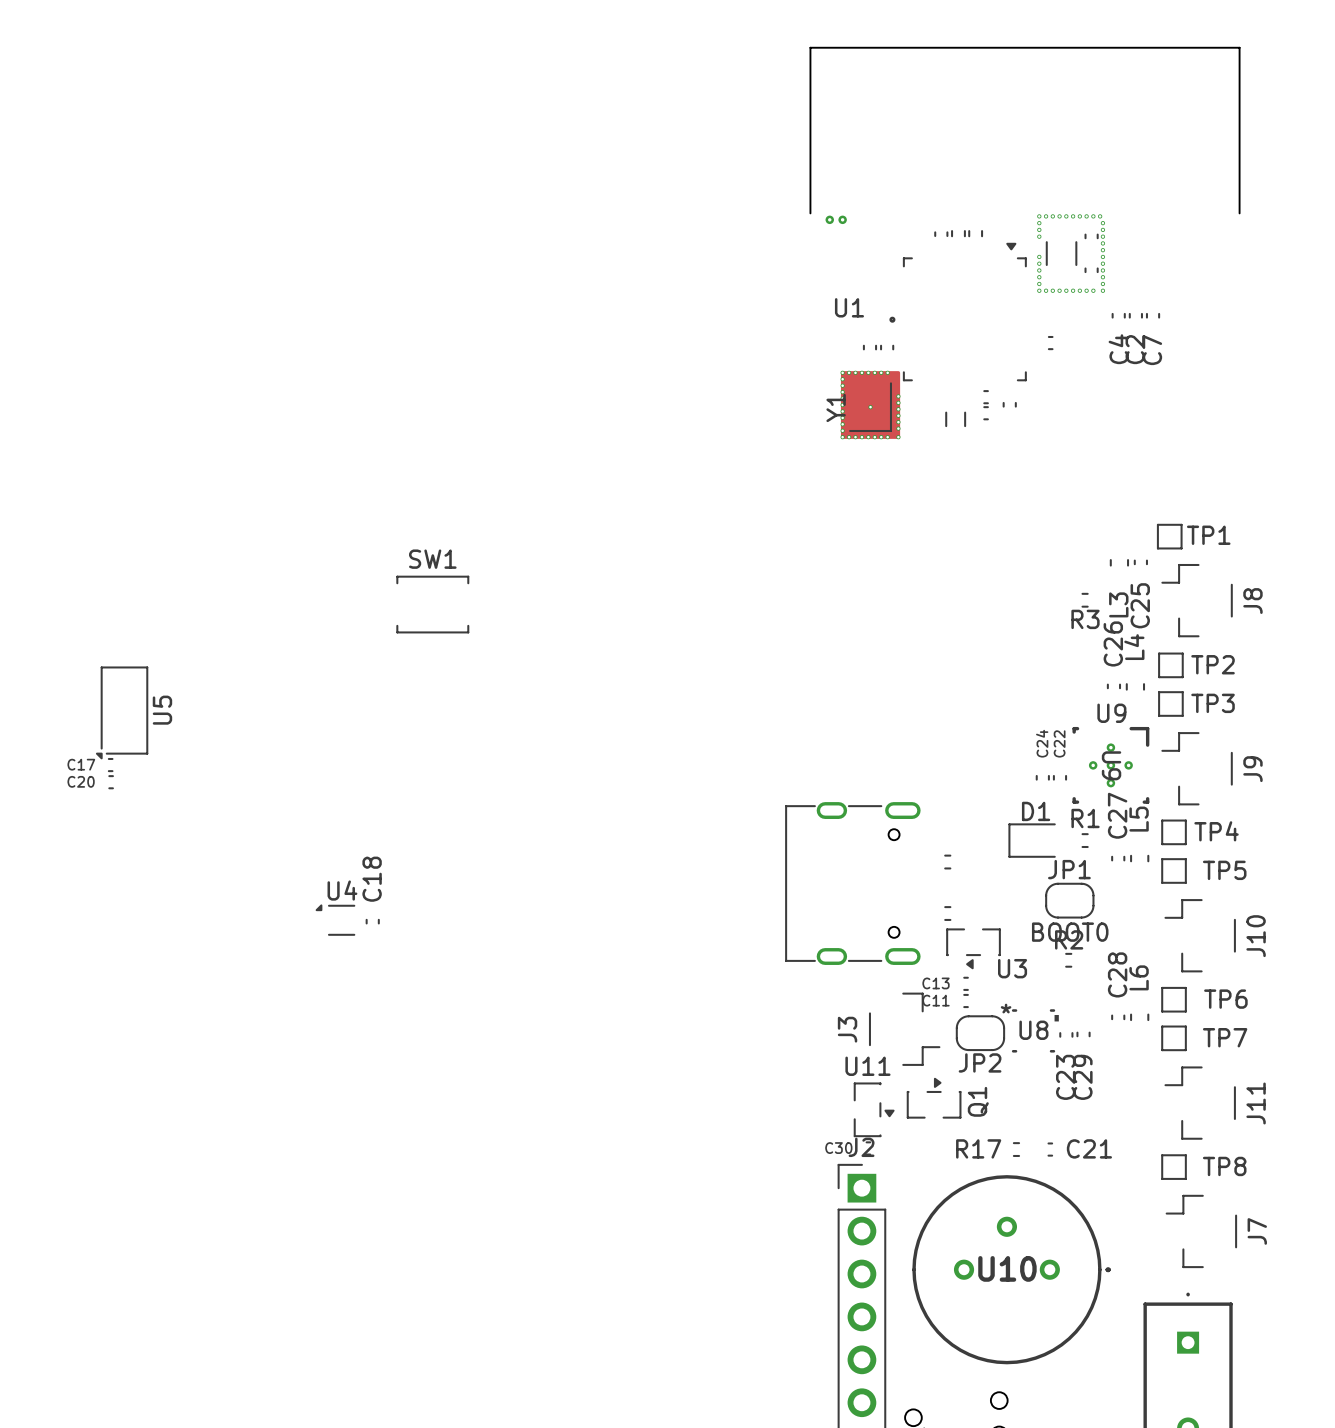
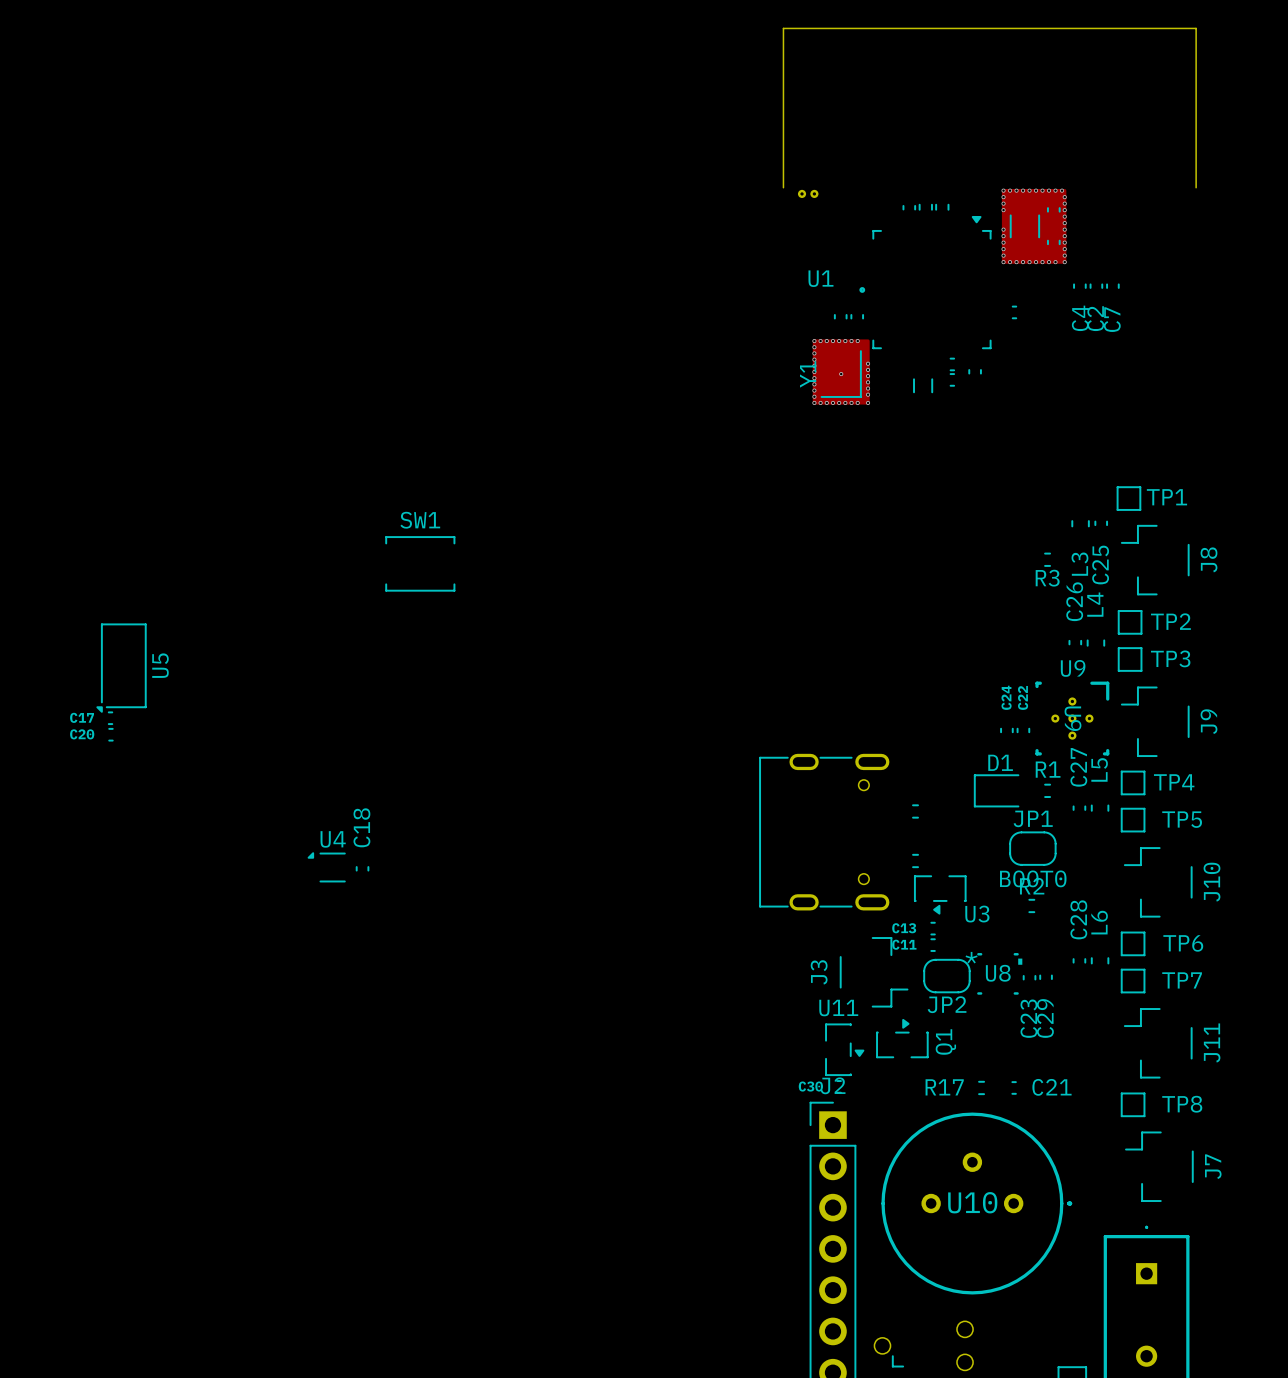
drawing: none -> [1001, 189, 1067, 264]

